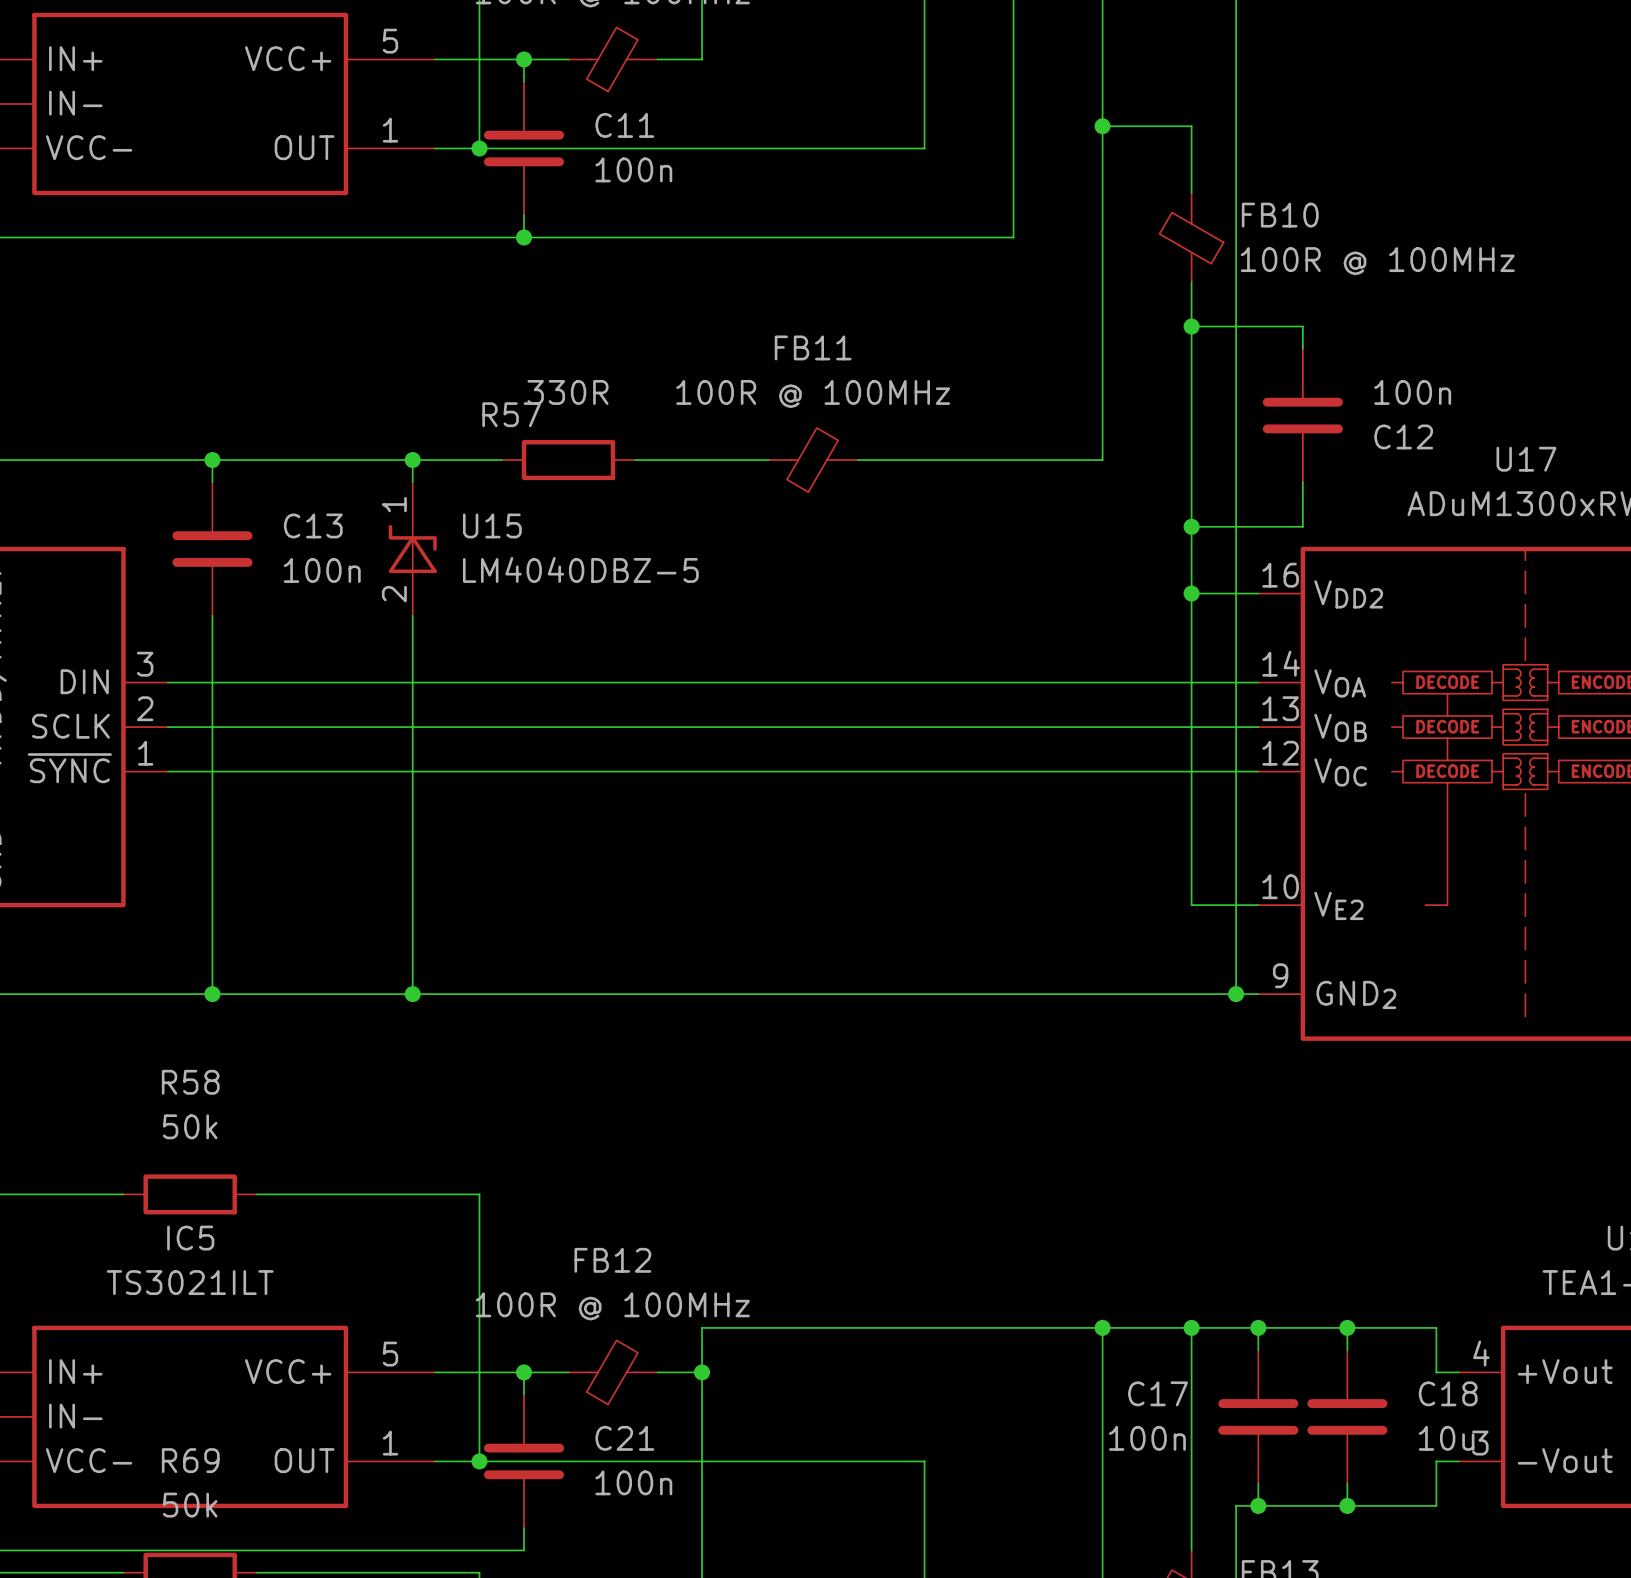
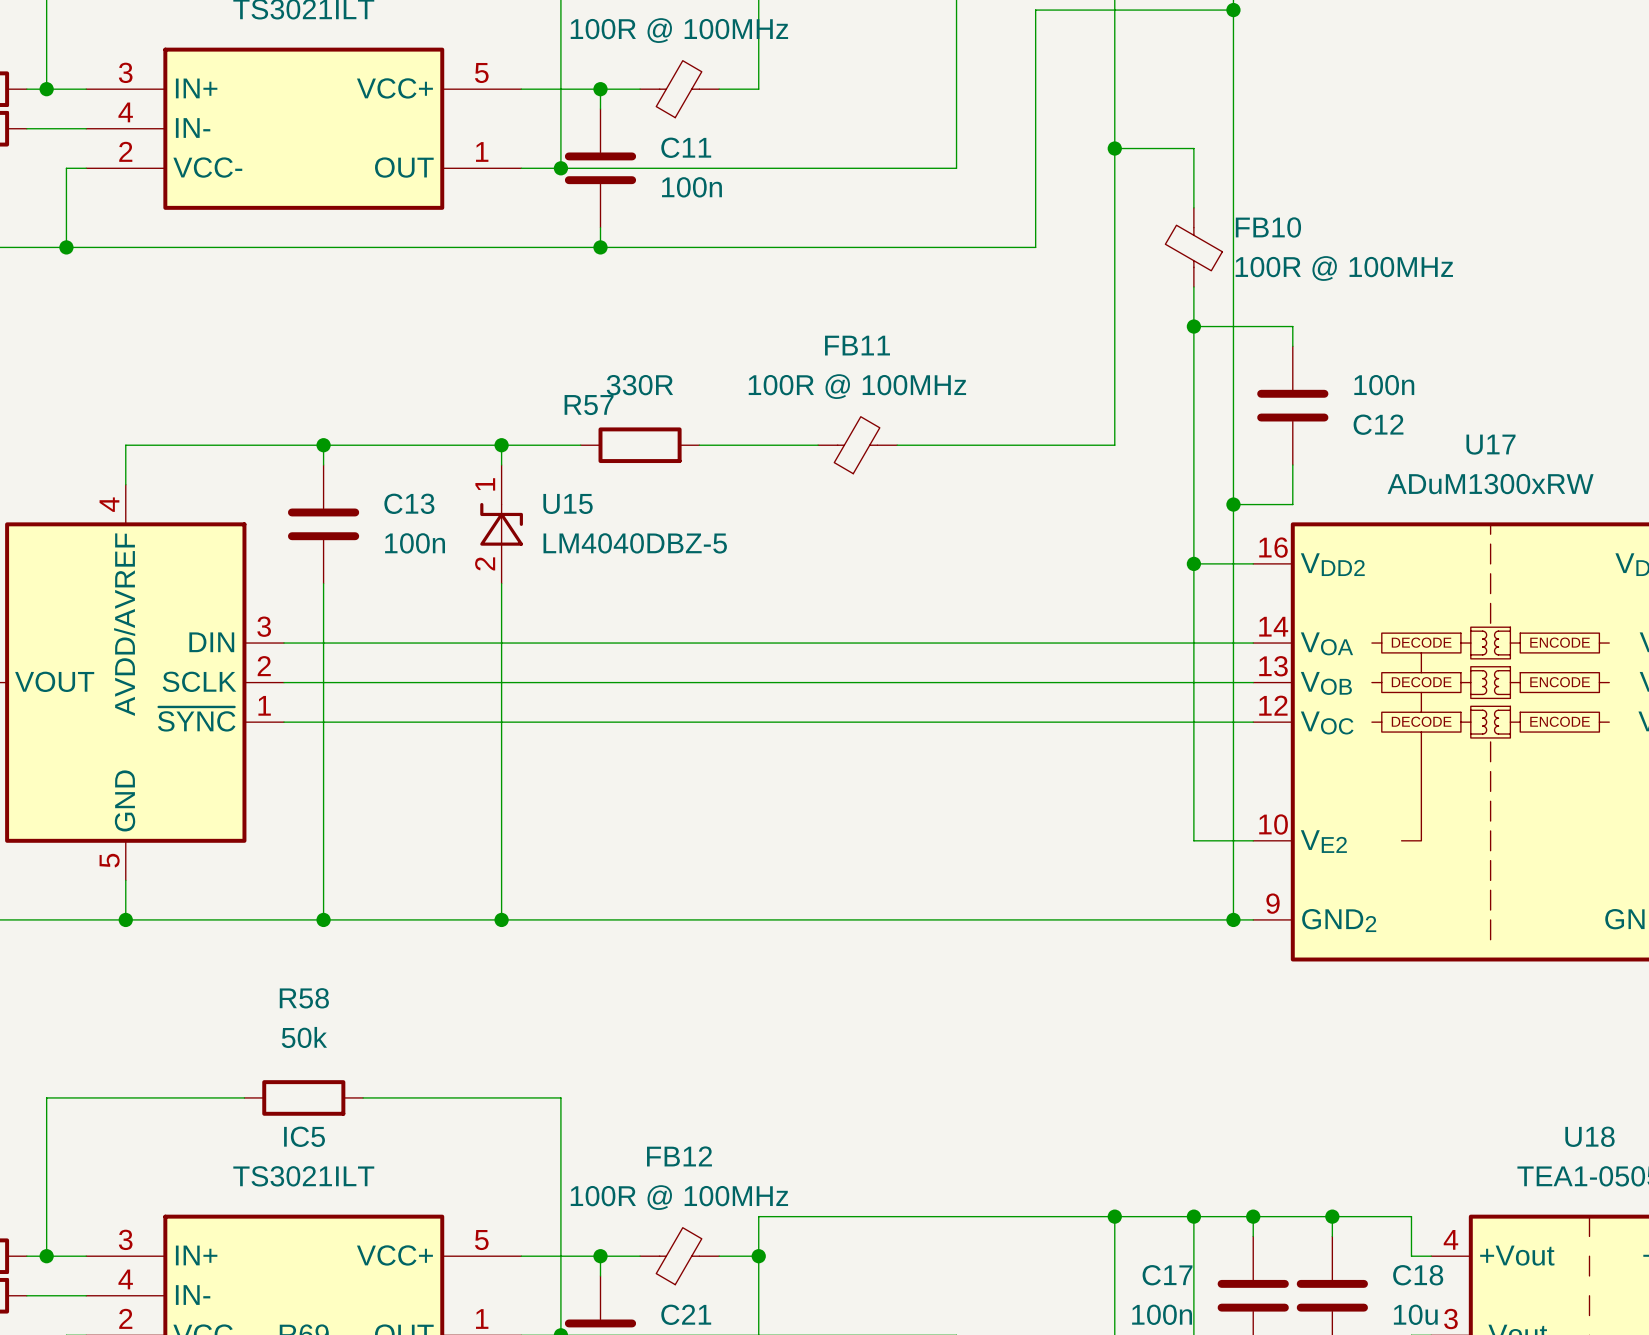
wire: (1191, 526) (1236, 526) -> none
junction position: (1191, 526) -> (1233, 504)

